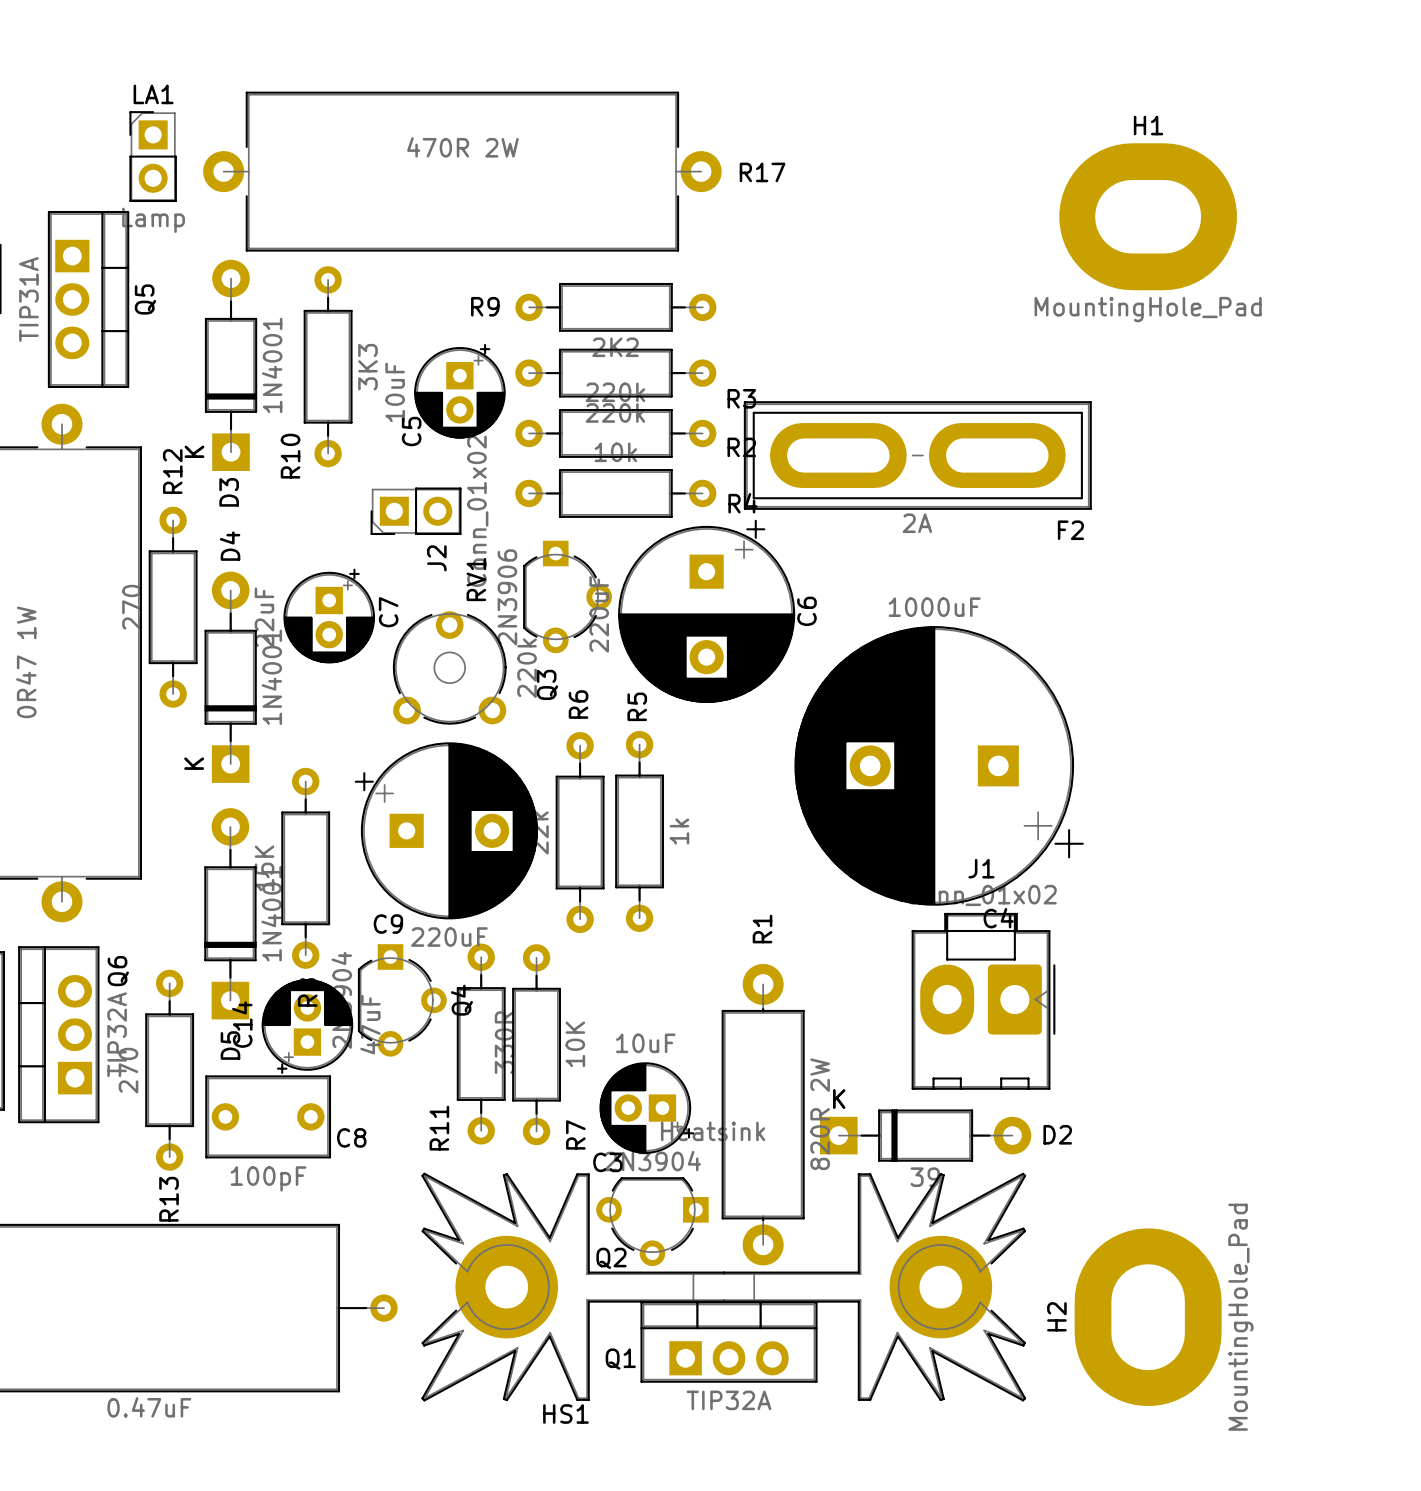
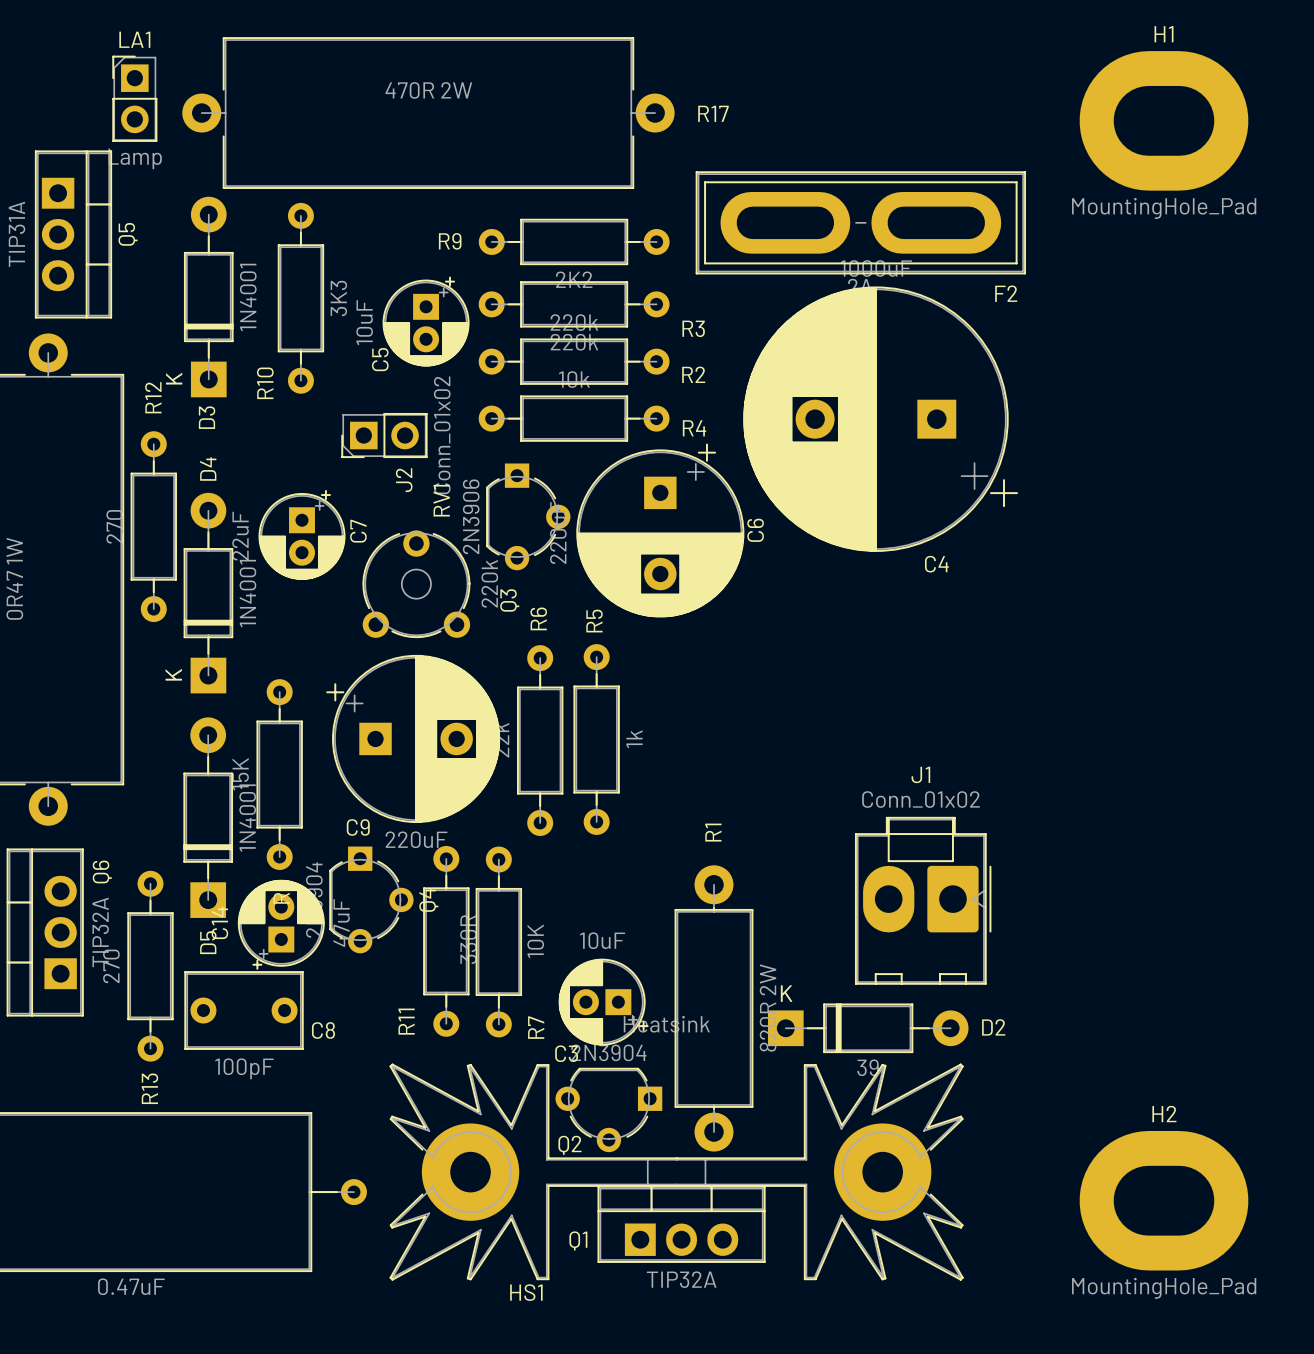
H1 position: (1148, 216) -> (1163, 120)
F2 position: (917, 455) -> (860, 222)
C4 position: (939, 765) -> (880, 419)
H2 rotation: 0° (1148, 1317) -> 90° clockwise (1163, 1200)

